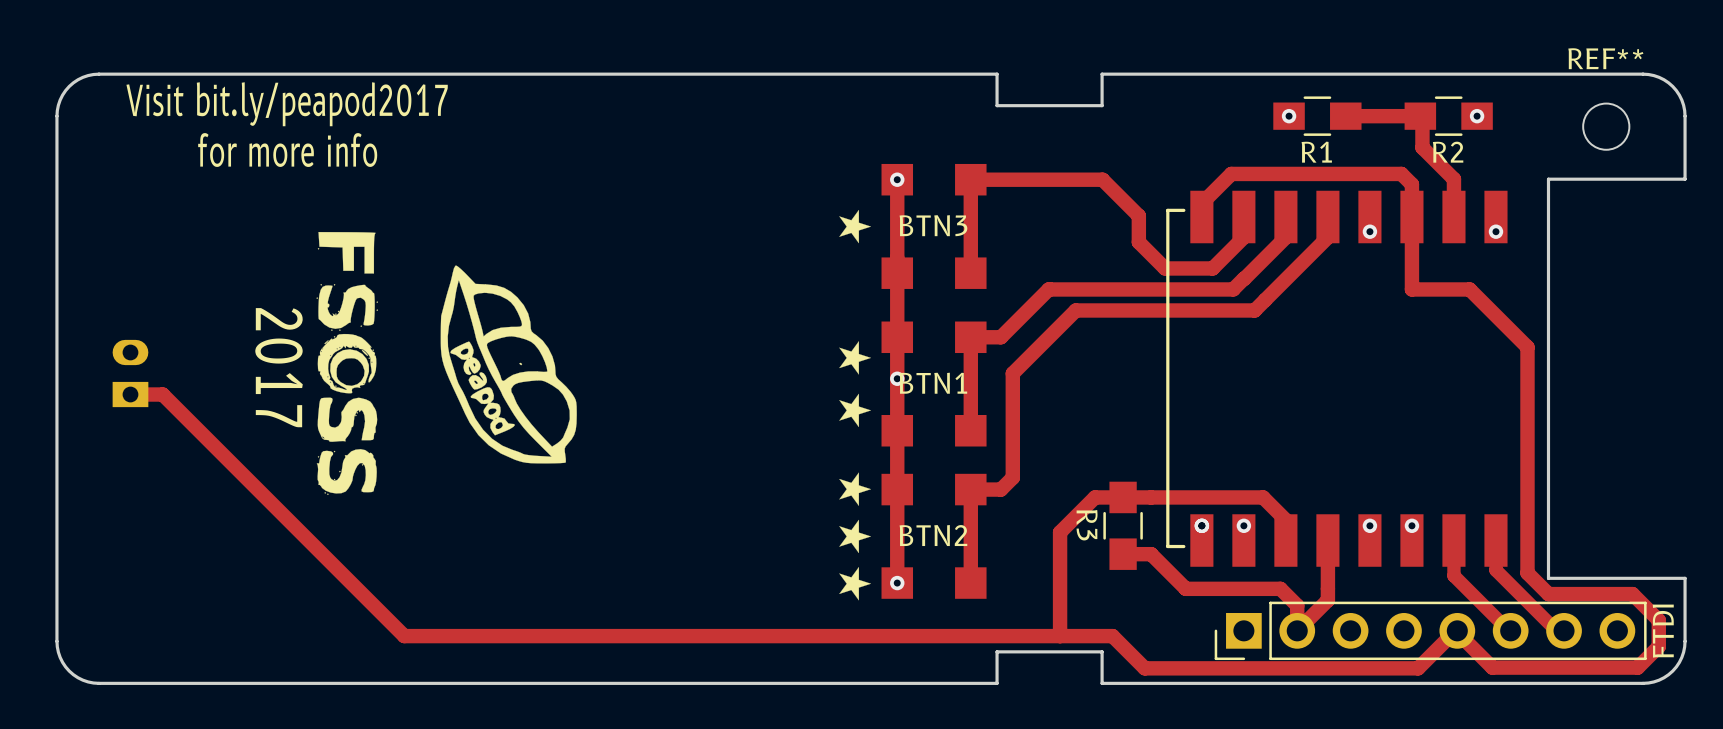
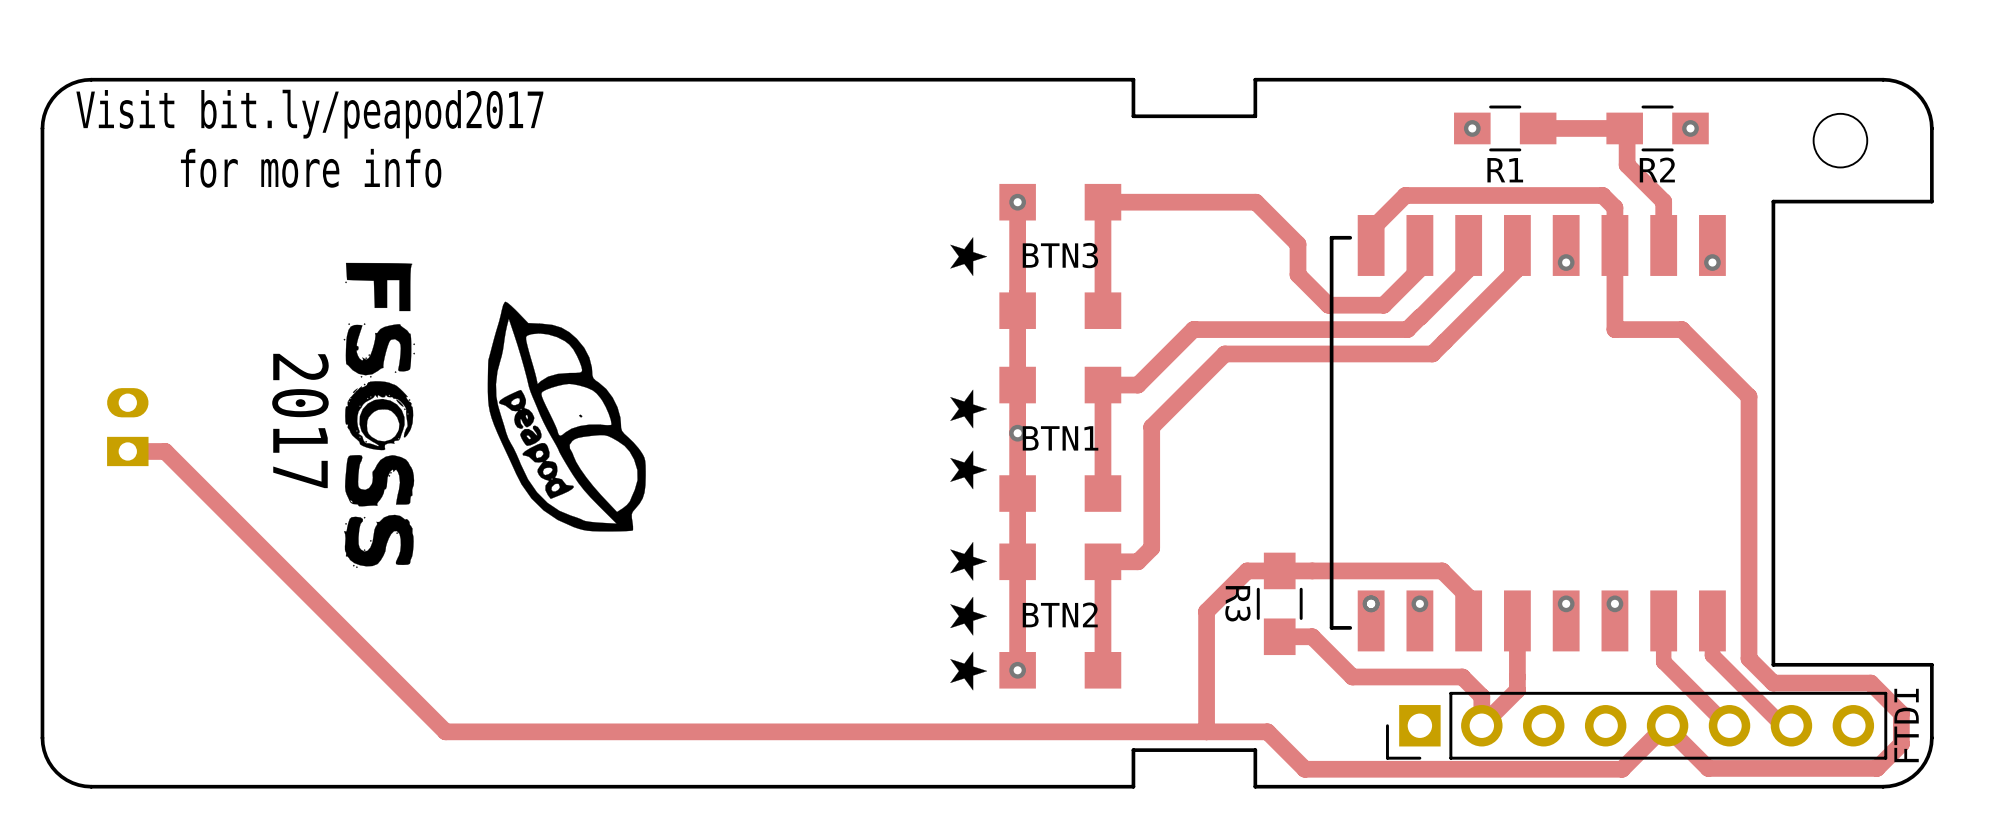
REF** name: REF** (1605, 58) -> none

